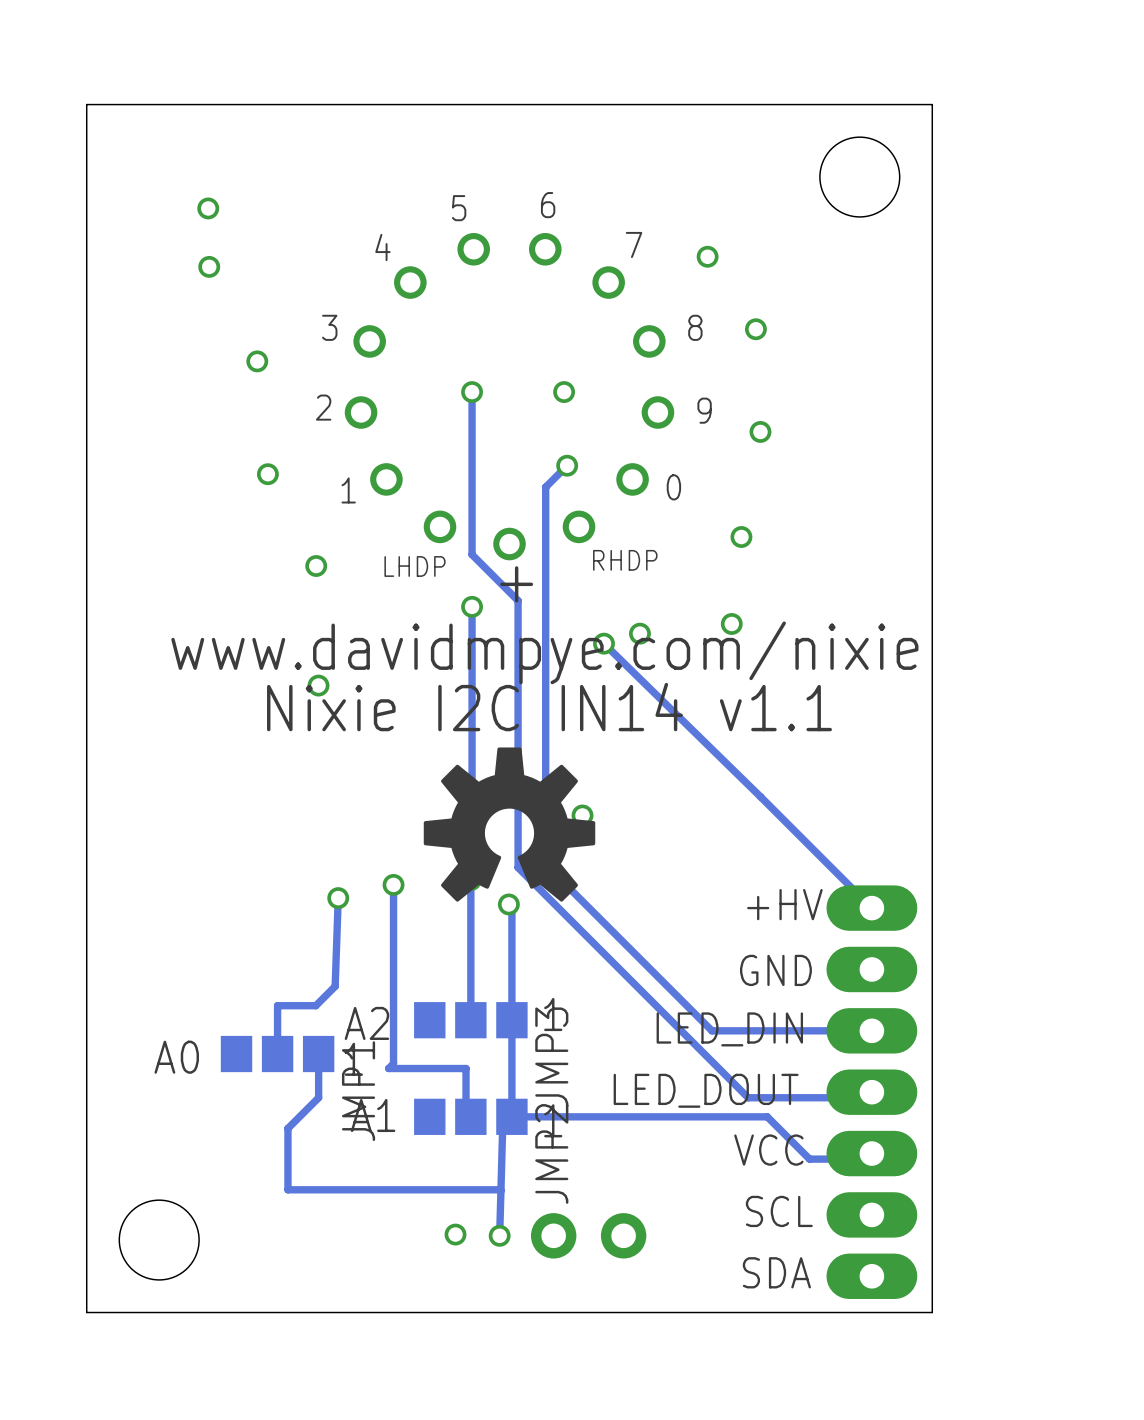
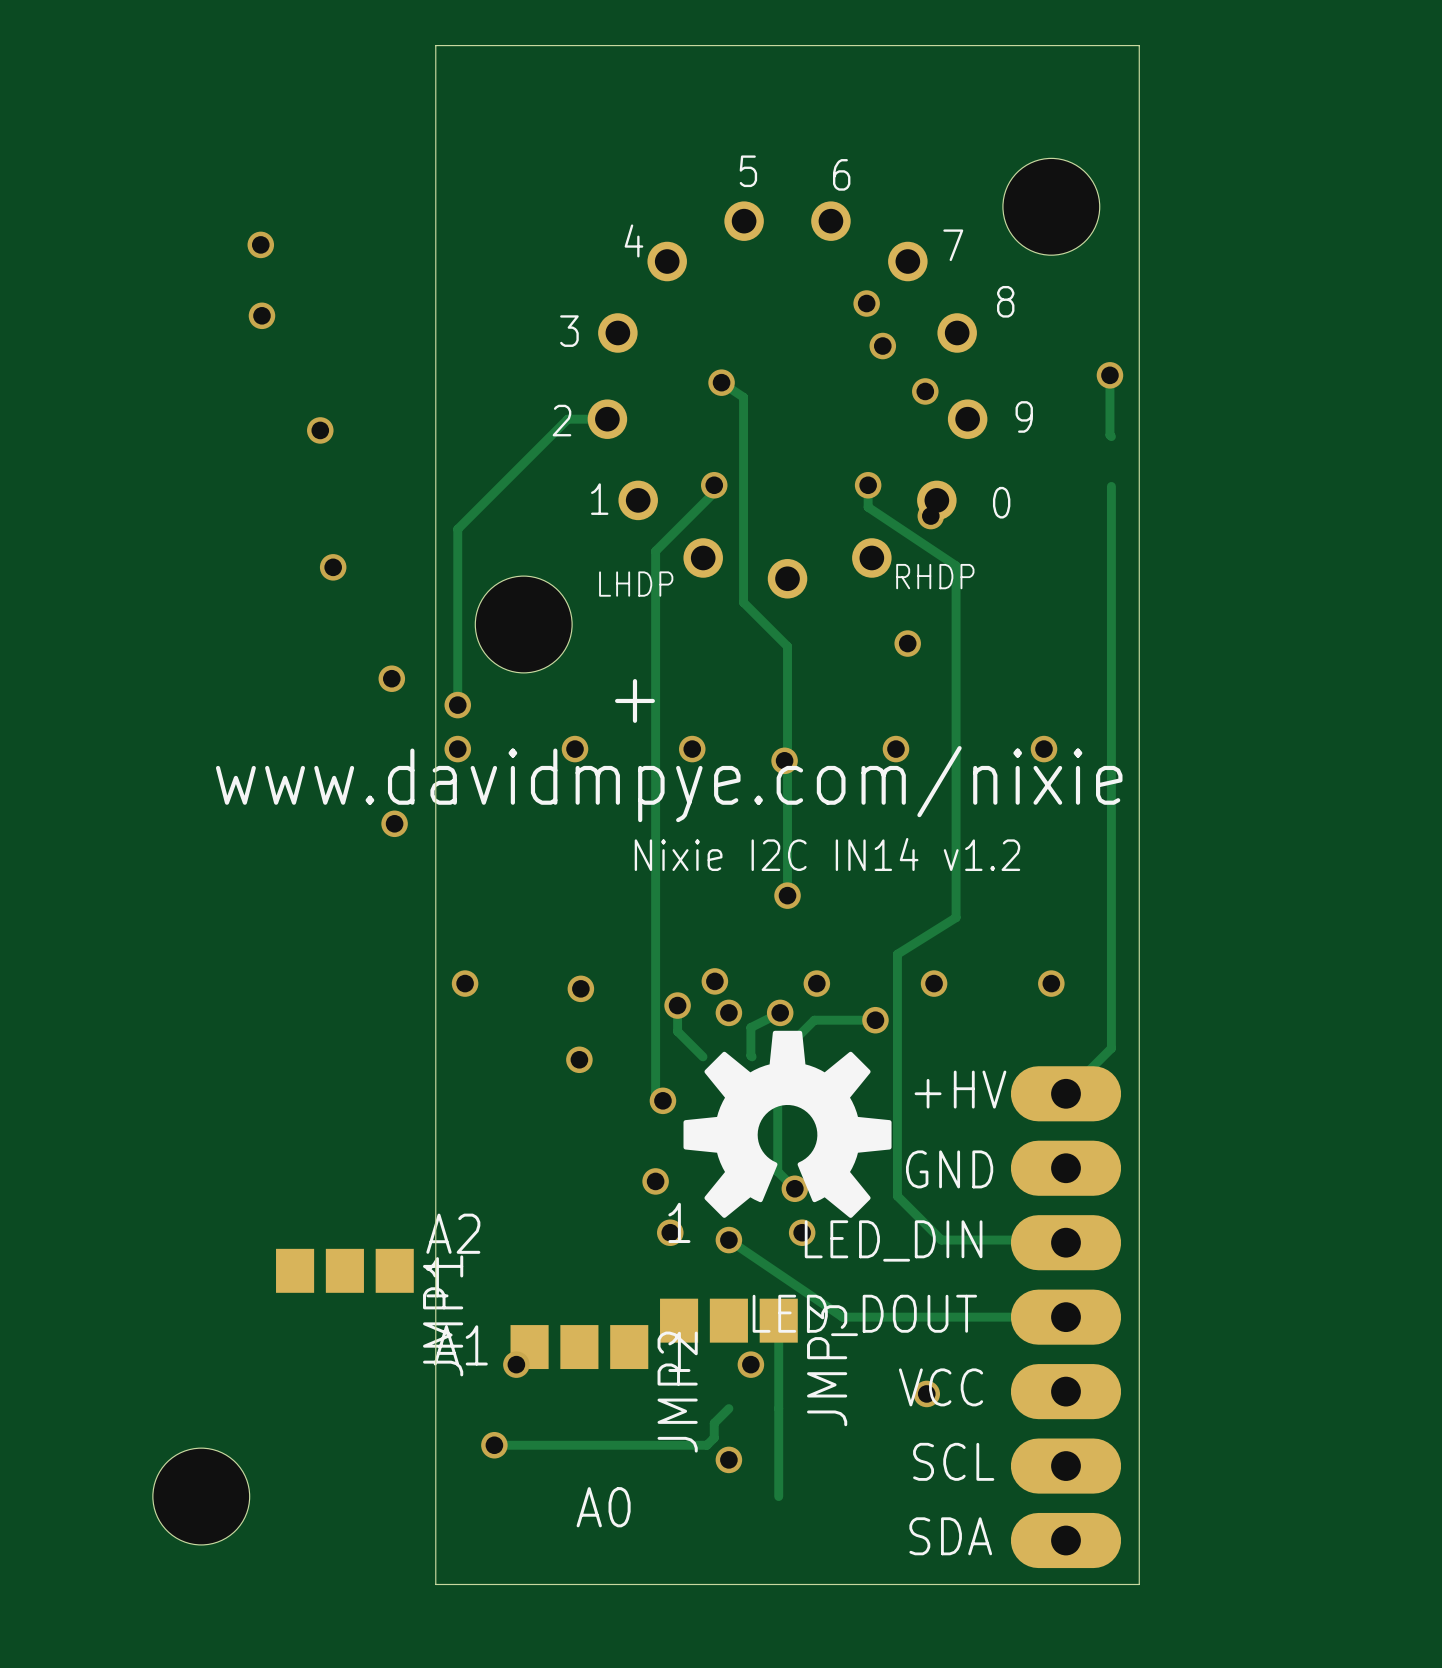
board edge: (932, 104) (86, 104) (86, 1312) (352, 1312) -> (1139, 118) (1139, 45) (435, 45) (435, 1584)
text position: 6 (548, 205) -> 6 (841, 174)
text position: 5 (459, 208) -> 5 (748, 171)
text position: 7 (634, 244) -> 7 (953, 245)
text position: 4 (382, 247) -> 4 (633, 240)
via: none -> (882, 346)
track: none -> (1109, 375) (1111, 436)
via: none -> (1109, 375)
track: none -> (721, 382) (743, 397) (743, 602) (787, 646) (787, 895)
via: none -> (721, 382)
text position: 3 (329, 327) -> 3 (569, 331)
text position: 8 (695, 327) -> 8 (1005, 301)
track: none -> (607, 419) (567, 419) (457, 529) (457, 705)
track: (472, 392) (472, 554) (518, 600) (518, 867) (748, 1097) (866, 1097) (871, 1092) -> (728, 1240) (842, 1317) (1065, 1317)
via: (472, 392) -> none
via position: (564, 392) -> (714, 485)
part position: (509, 396) -> (787, 399)
track: none -> (714, 485) (714, 492) (655, 551) (655, 1093) (662, 1100)
via: none -> (868, 485)
text position: 2 (323, 407) -> 2 (561, 420)
text position: 9 (704, 410) -> 9 (1024, 416)
track: (567, 465) (545, 487) (545, 864) (711, 1030) (871, 1030) -> (868, 485) (868, 507) (956, 565) (956, 917) (897, 954) (897, 1196) (941, 1240) (1063, 1240) (1065, 1242)
via: (567, 465) -> none
text position: 0 (673, 487) -> 0 (1001, 502)
text position: 1 (348, 490) -> 1 (599, 499)
part: none -> (523, 624)
text position: RHDP (625, 560) -> RHDP (935, 576)
text position: LHDP (414, 566) -> LHDP (636, 584)
via: none -> (457, 705)
track: (472, 606) (472, 821) -> none
via position: (472, 606) -> (575, 749)
via: none -> (457, 749)
via: none -> (1044, 749)
track: (603, 643) (871, 908) -> (1111, 486) (1111, 1048) (1065, 1093)
via position: (603, 643) -> (692, 749)
text: Nixie I2C IN14 v1.1 (549, 707) -> Nixie I2C IN14 v1.2 (827, 854)
via: none -> (787, 895)
via: none -> (465, 983)
via: none -> (816, 983)
via: none -> (934, 983)
via: none -> (1051, 983)
drawing position: (509, 824) -> (787, 1124)
track: none -> (677, 1005) (677, 1031) (702, 1056)
via: none -> (677, 1005)
via: none -> (728, 1012)
track: none -> (780, 1012) (750, 1027) (752, 1056)
via: none -> (780, 1012)
track: none -> (875, 1020) (814, 1020) (777, 1056)
via: none -> (875, 1020)
track: (470, 880) (470, 1020) -> none
track: (393, 884) (393, 1063) (388, 1068) (466, 1068) (466, 1112) (470, 1116) -> none
via: (393, 884) -> none
track: (338, 898) (335, 986) (315, 1005) (277, 1005) (277, 1054) -> none
via: (338, 898) -> none
track: (508, 904) (511, 907) (511, 1116) -> none
via position: (508, 904) -> (662, 1100)
track: none -> (777, 1100) (777, 1171) (794, 1188)
via: none -> (655, 1181)
via: none -> (794, 1188)
JMP3 position: (470, 1020) -> (728, 1320)
via: none -> (670, 1232)
via: none -> (802, 1232)
via: none -> (728, 1240)
track: (318, 1054) (318, 1097) (287, 1128) (287, 1189) (500, 1190) -> none
text position: A0 (176, 1057) -> A0 (603, 1507)
track: none -> (778, 1320) (778, 1496)
track: (511, 1116) (502, 1126) (499, 1235) -> none
track: (511, 1116) (767, 1116) (809, 1159) (866, 1159) (871, 1153) -> none
via: none -> (516, 1364)
via: none -> (750, 1364)
via: none -> (926, 1393)
track: none -> (728, 1408) (714, 1423) (714, 1437) (706, 1445) (494, 1445)
via: none -> (494, 1445)
via: none -> (728, 1459)
via: (455, 1234) -> none
via: (499, 1235) -> none
part: (588, 1235) -> none

